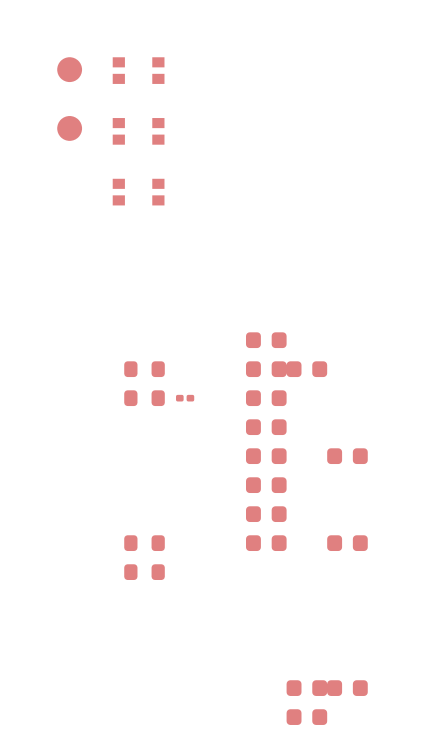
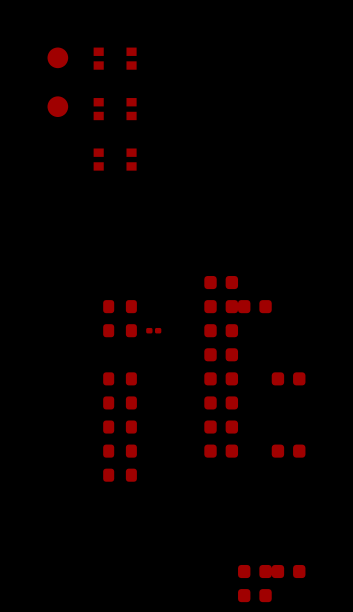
part: none -> (120, 378)
part: none -> (120, 402)
part: none -> (120, 427)

